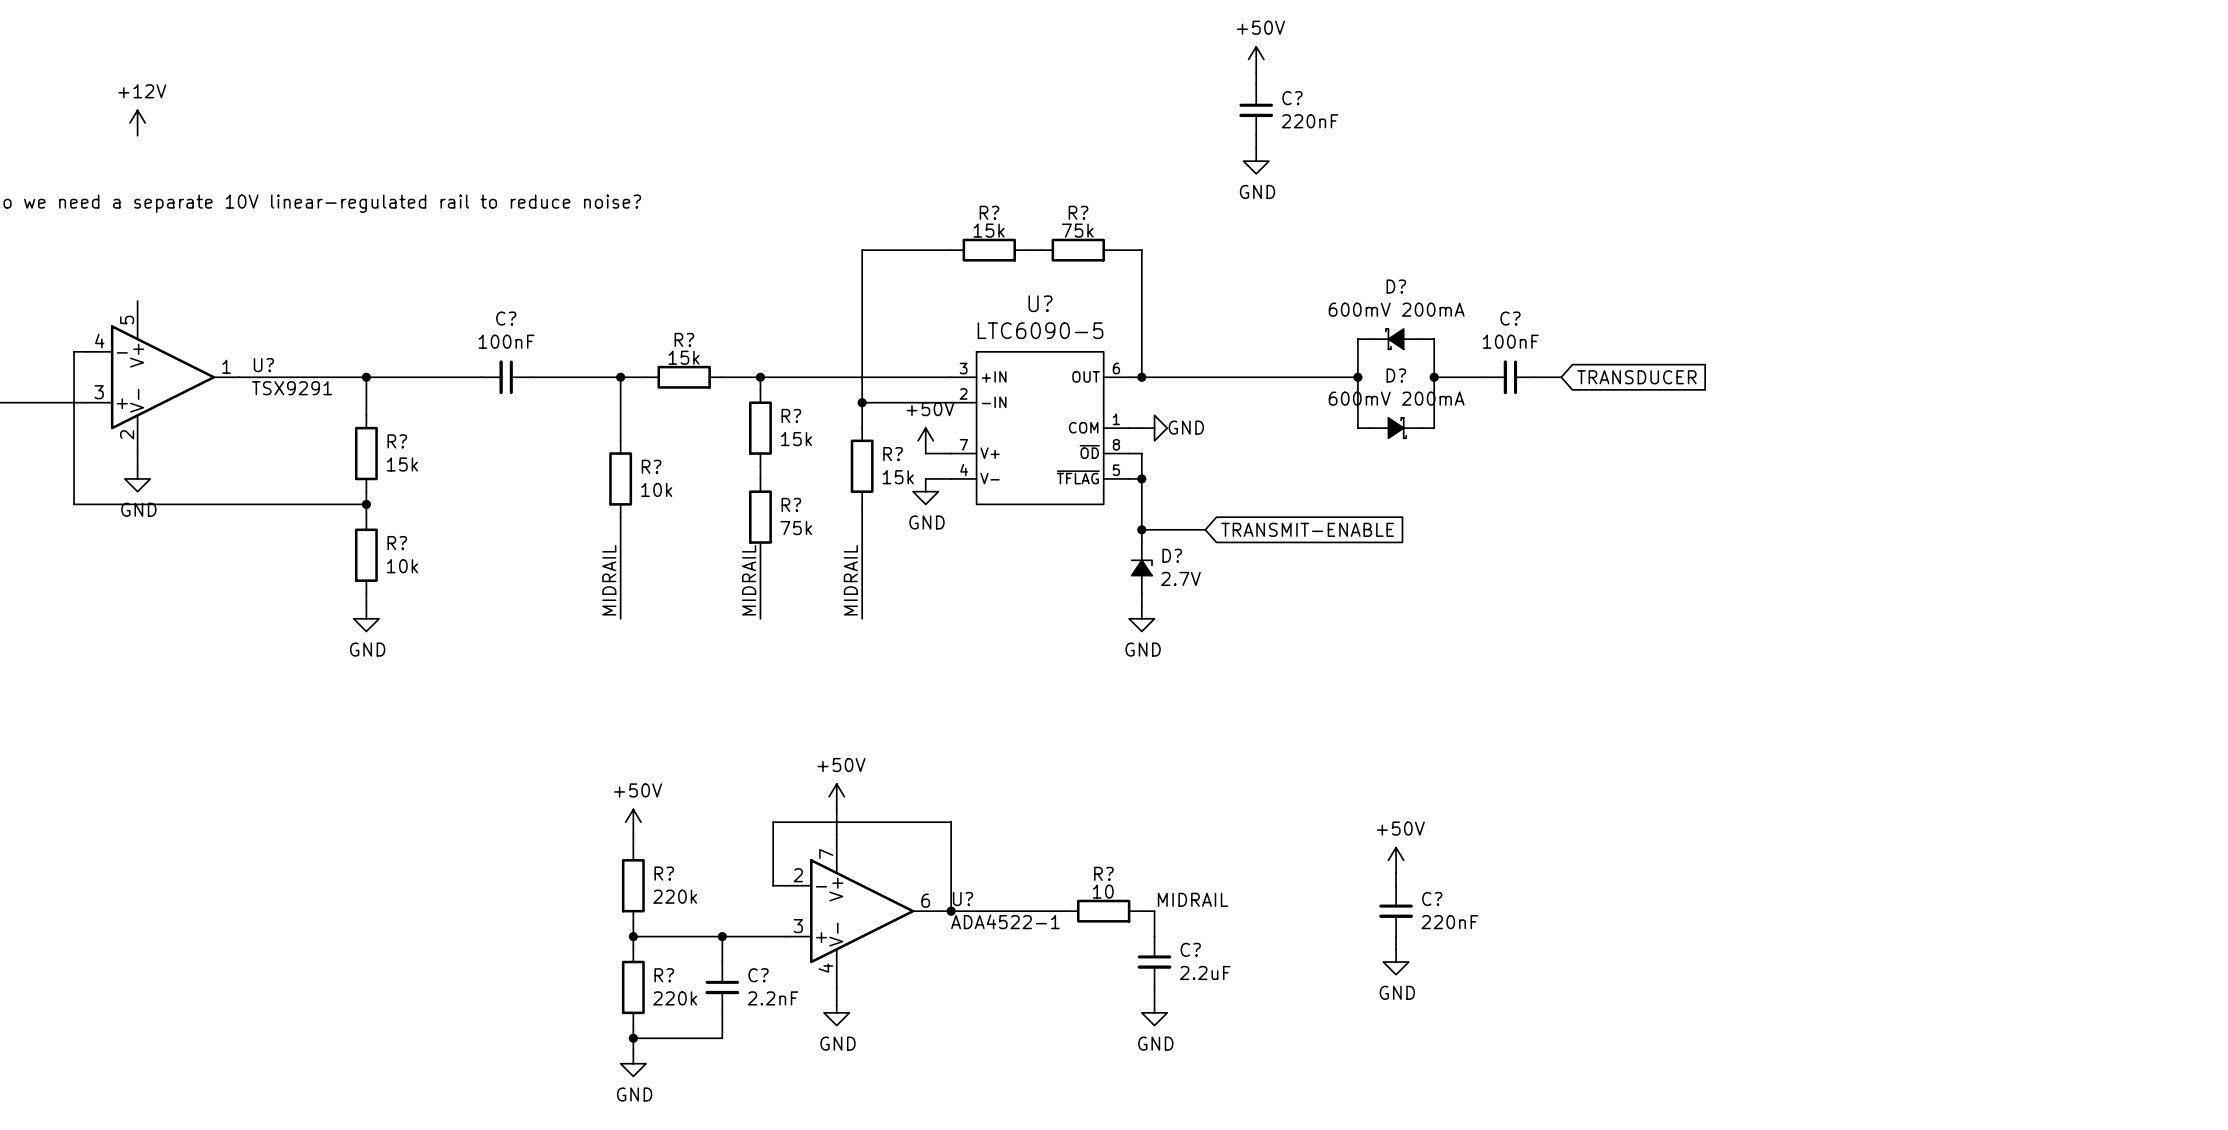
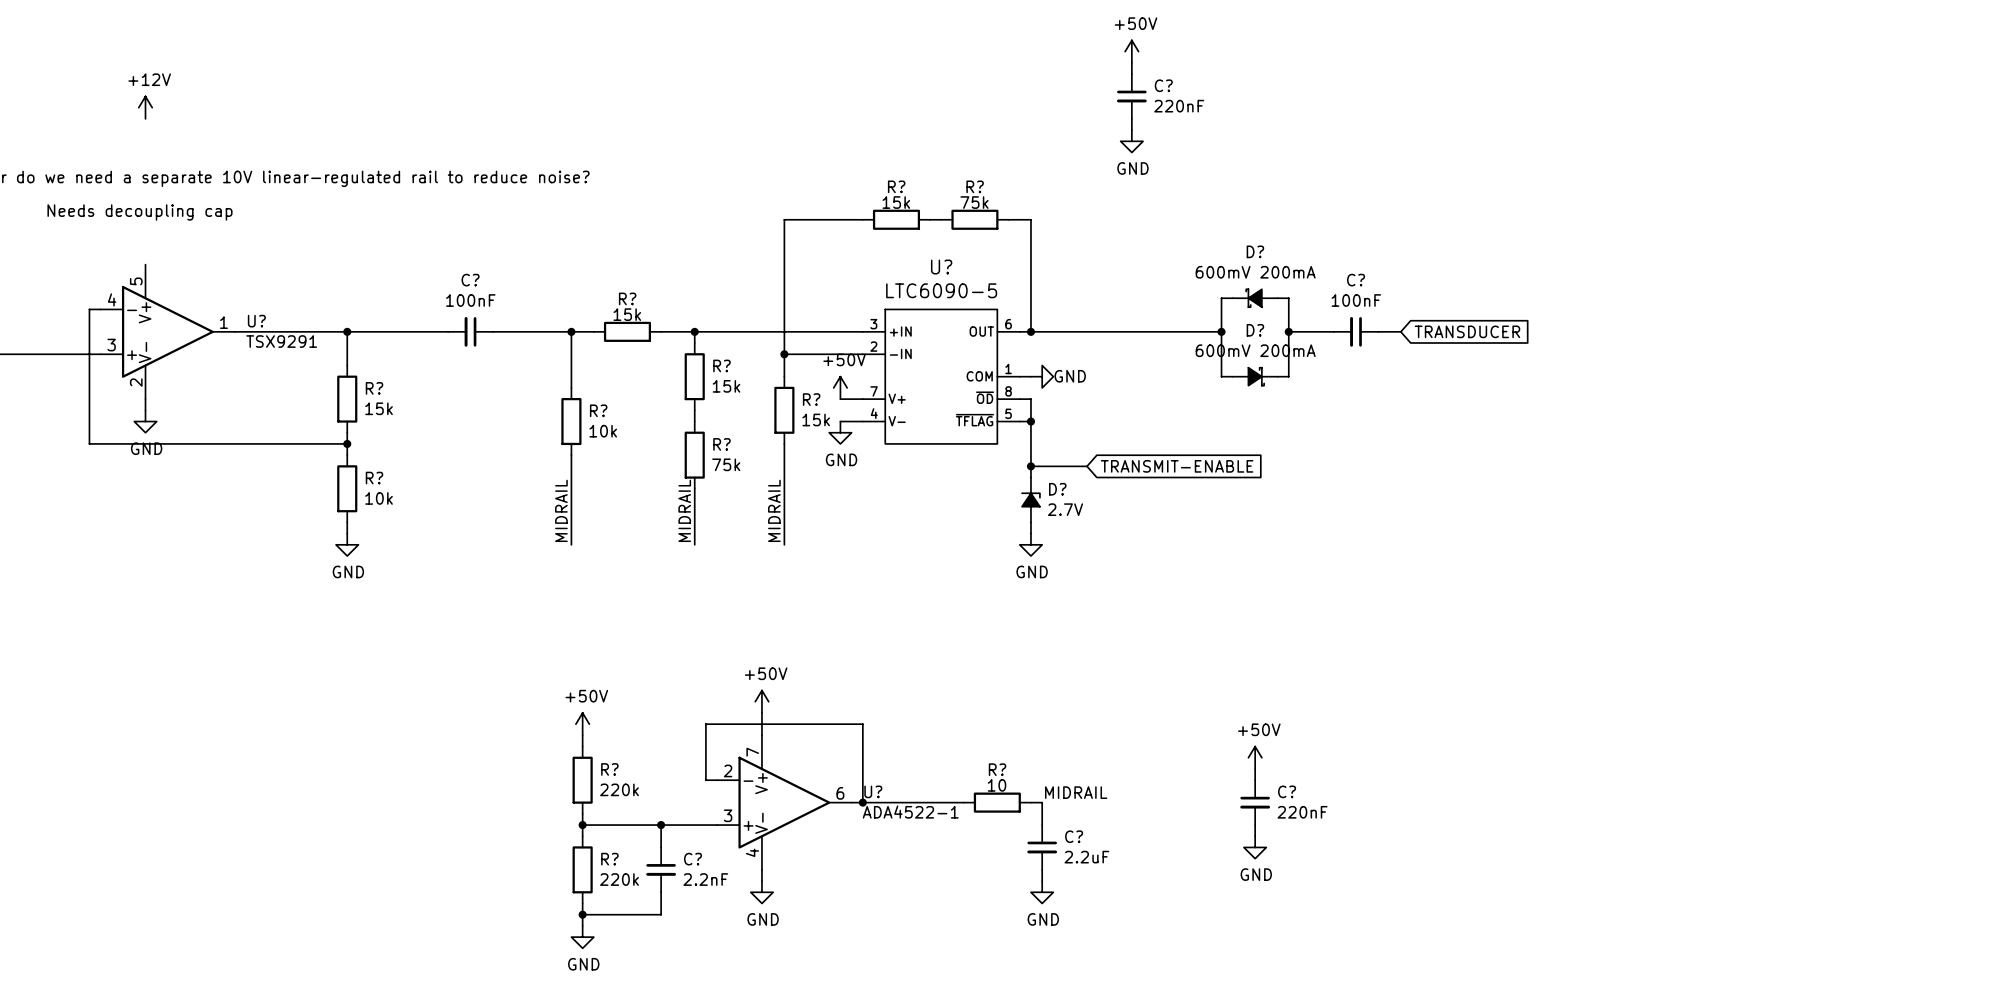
text: none -> Needs decoupling cap (139, 212)

